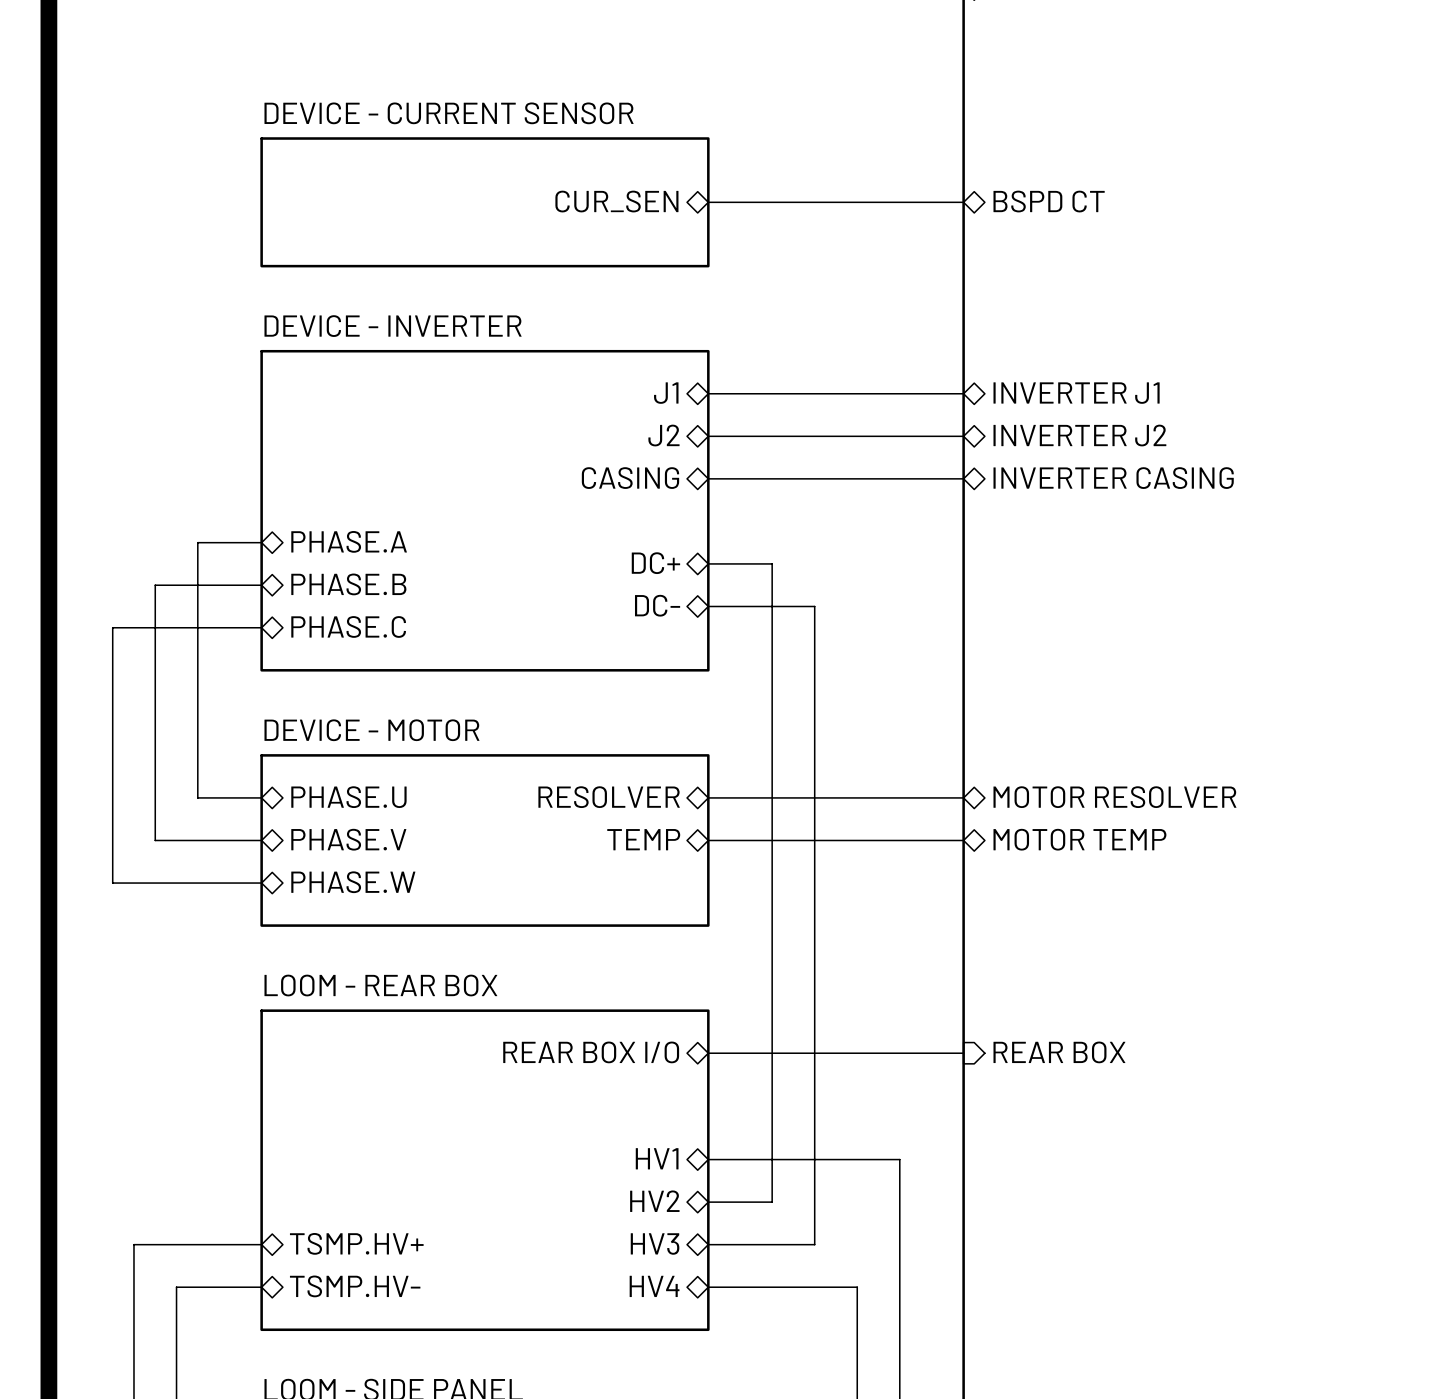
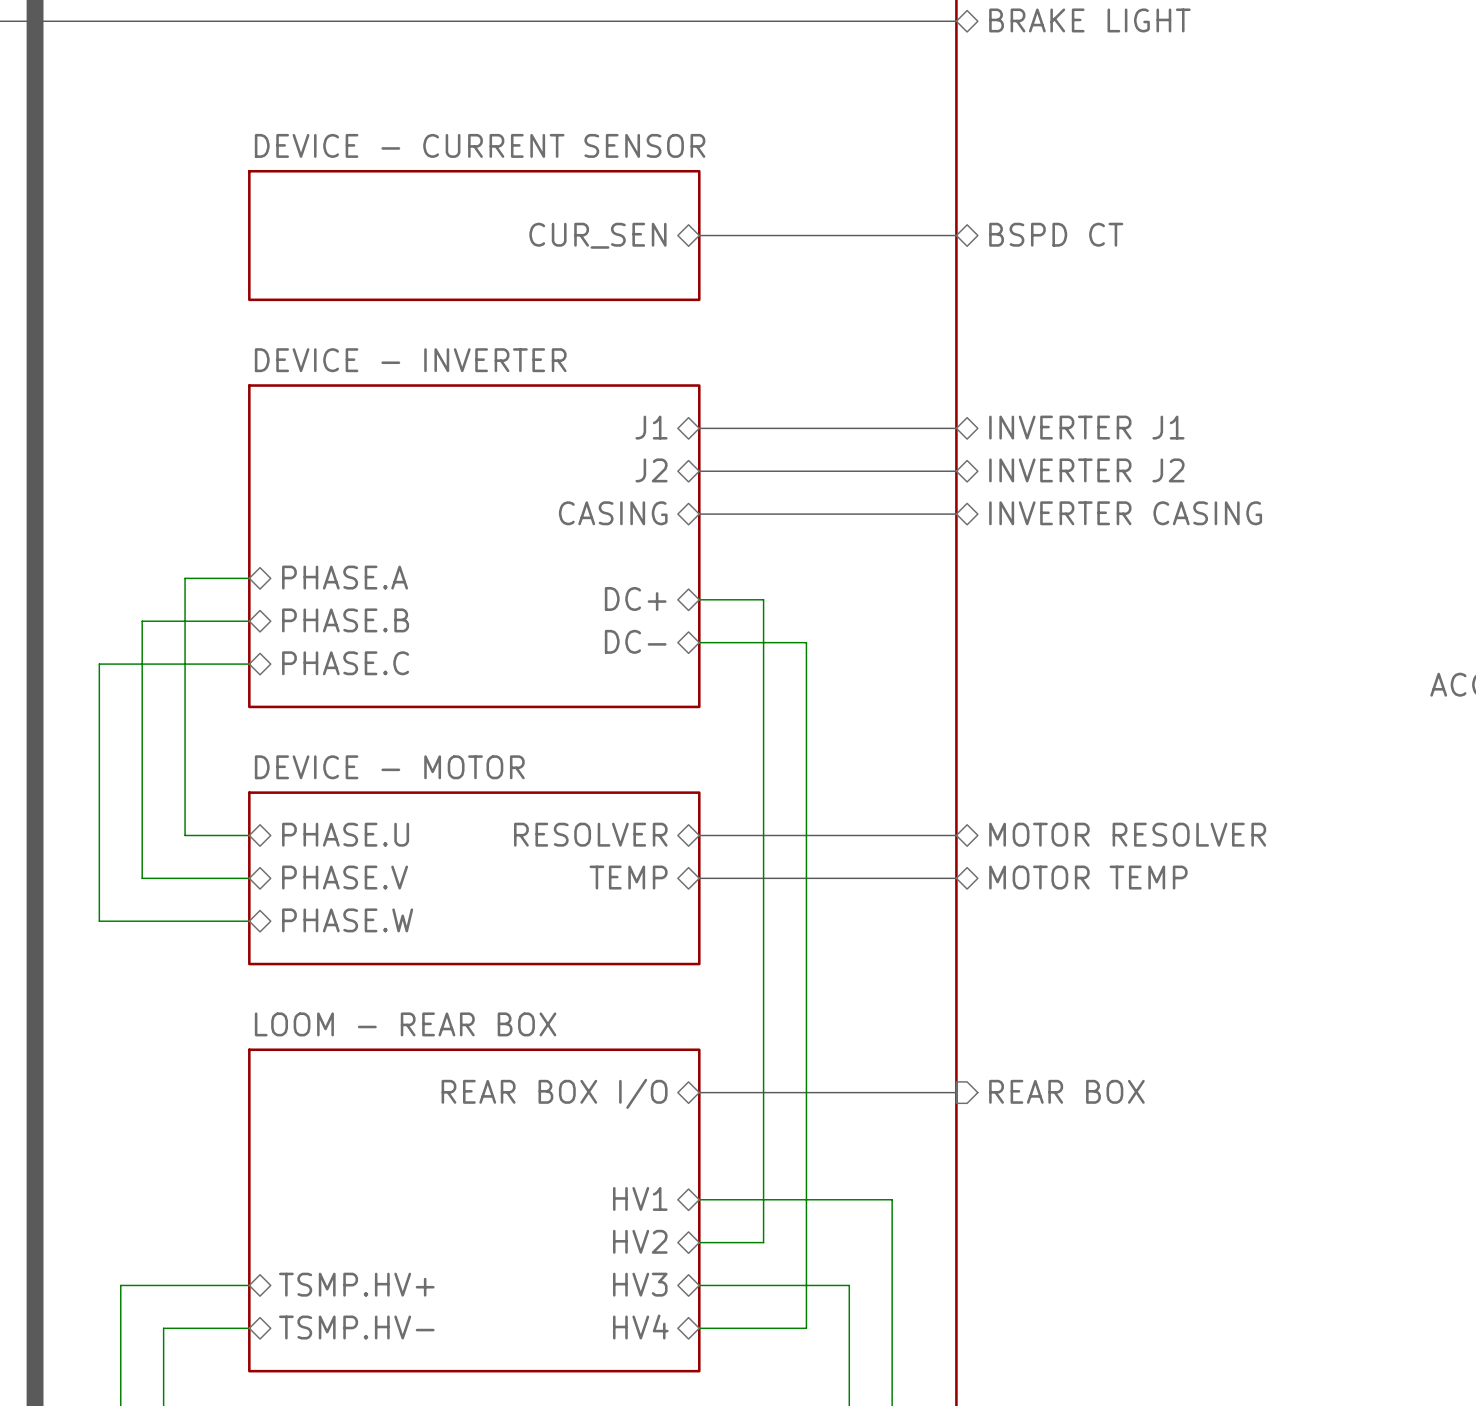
wire: (814, 1287) (857, 1287) -> (806, 1328) (806, 1285) (849, 1285) (849, 1328)

